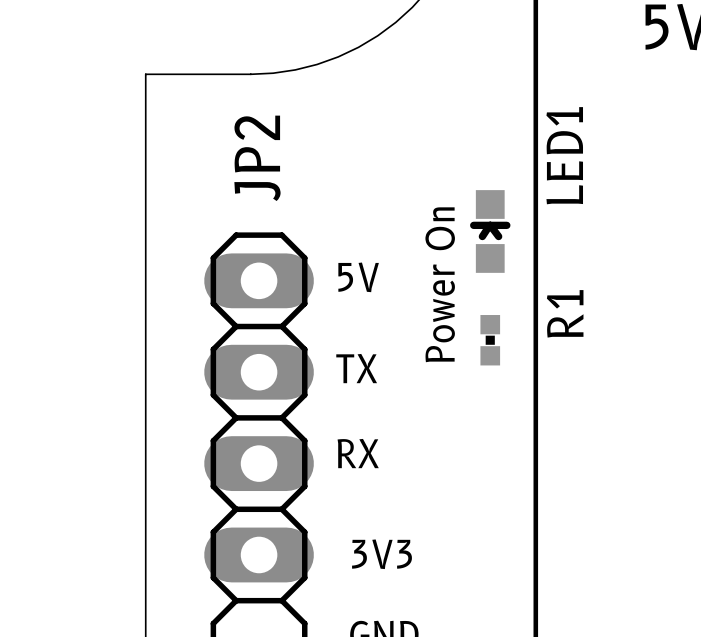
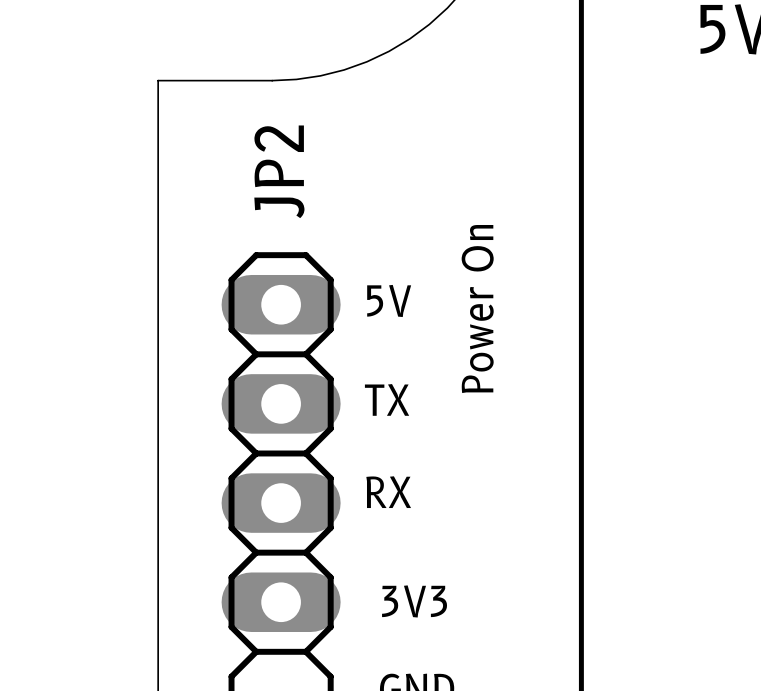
LED1: (490, 231) -> none
R1: (490, 340) -> none

